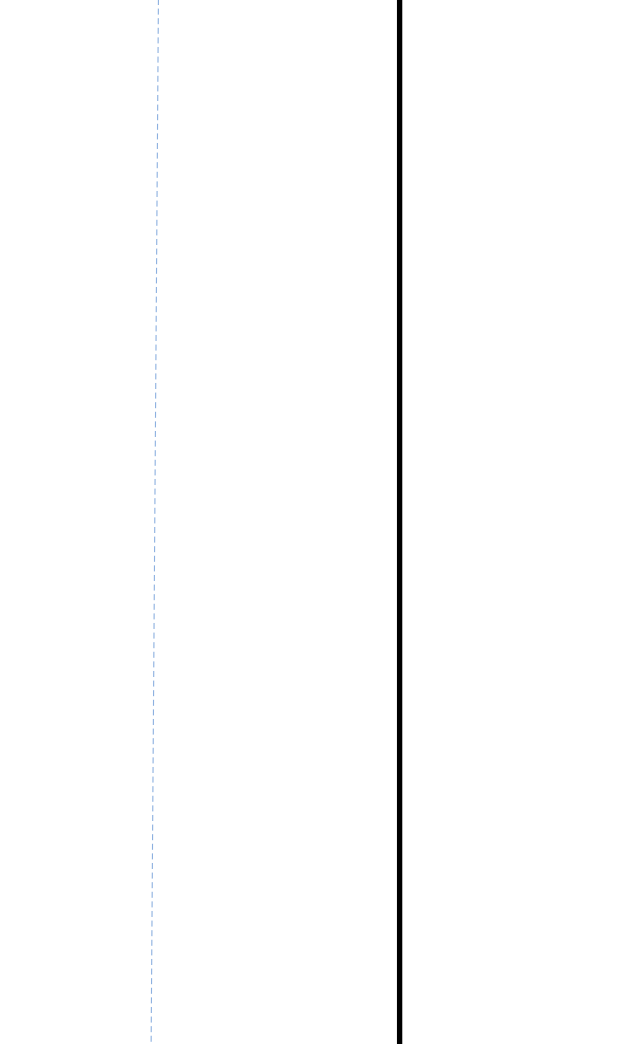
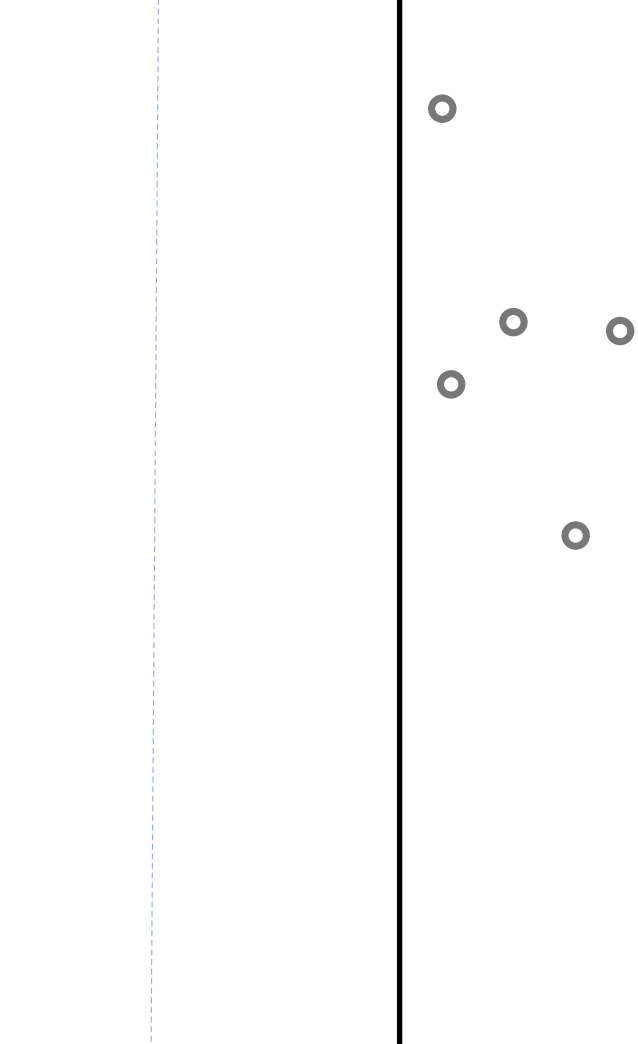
via: none -> (442, 108)
via: none -> (513, 322)
via: none -> (620, 331)
via: none -> (451, 384)
via: none -> (575, 535)

